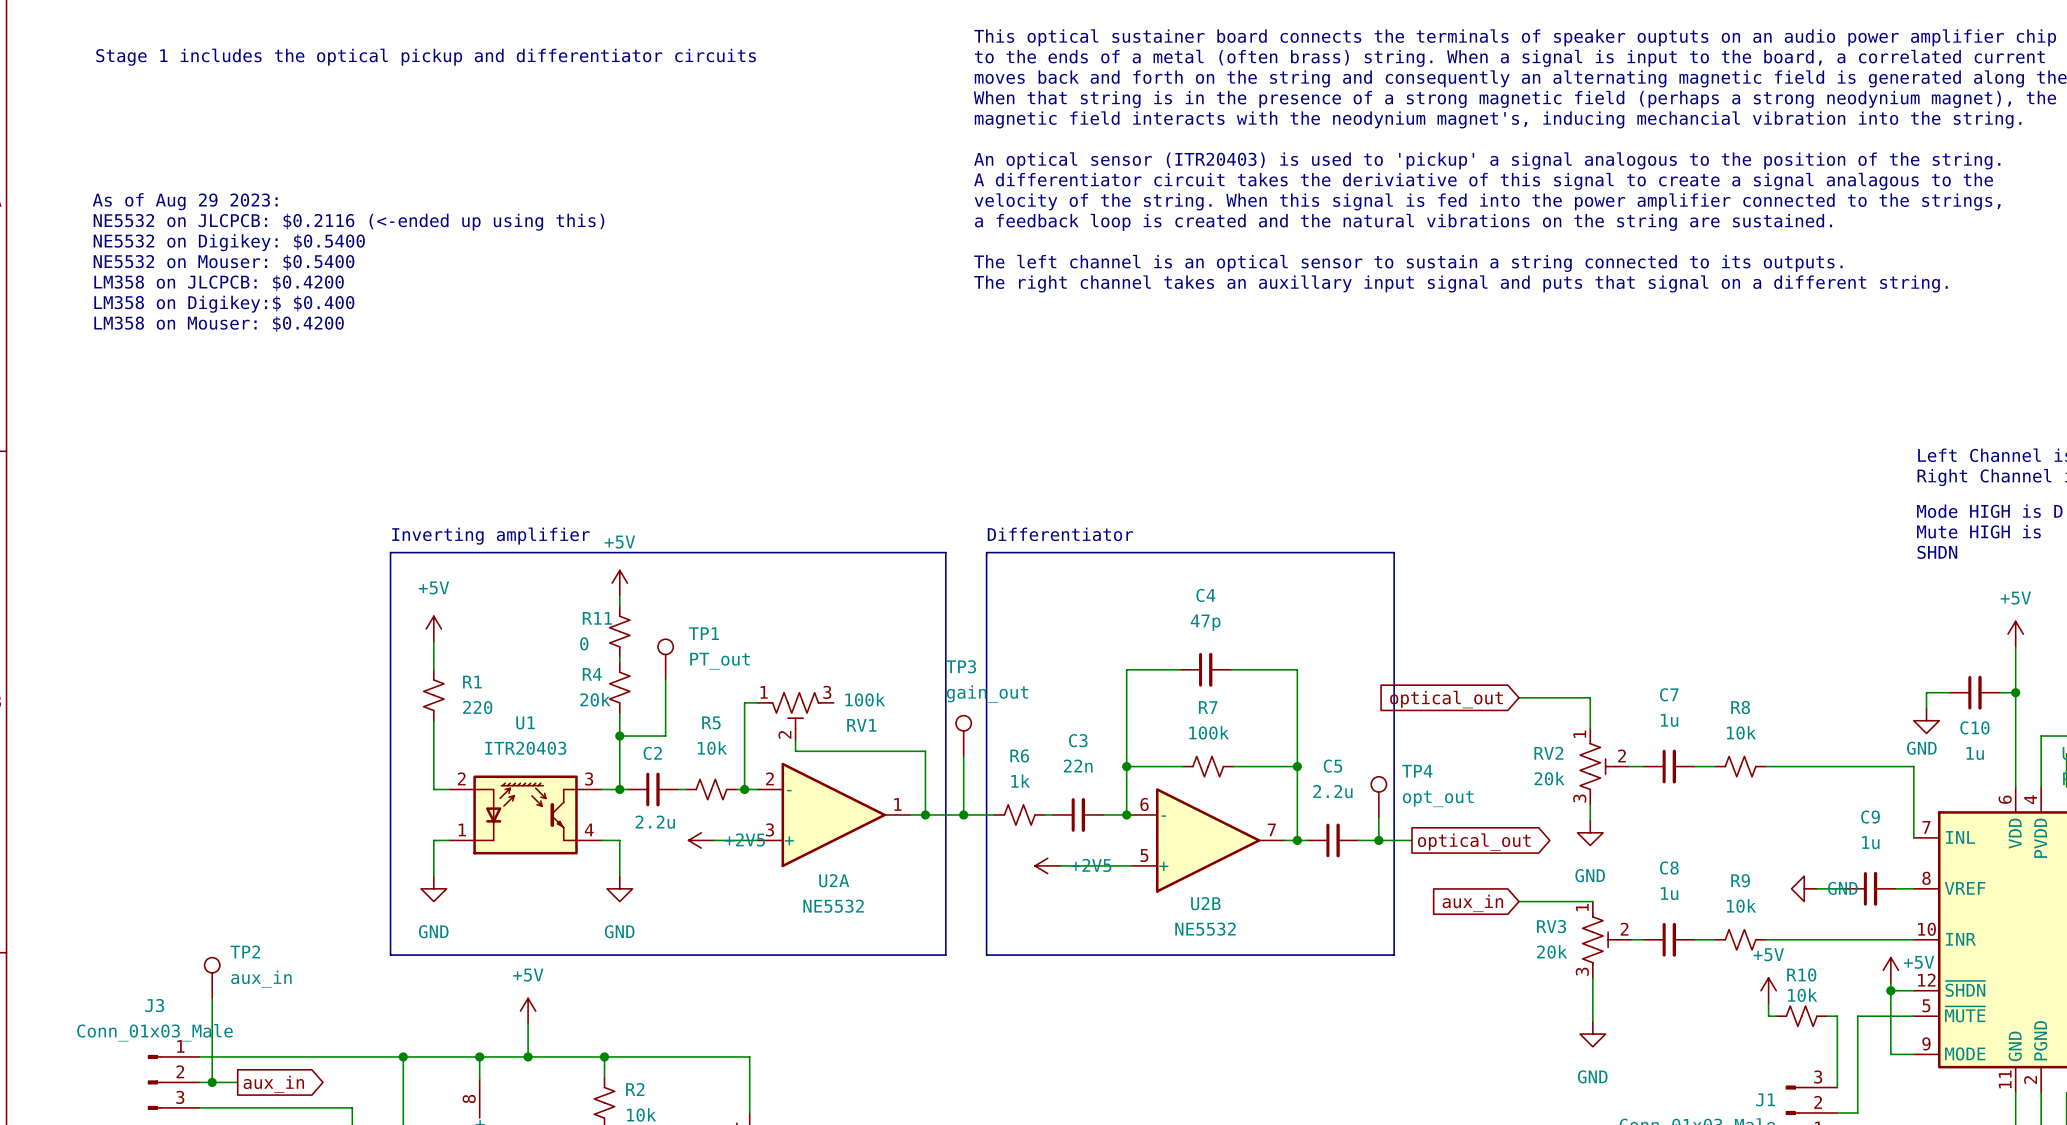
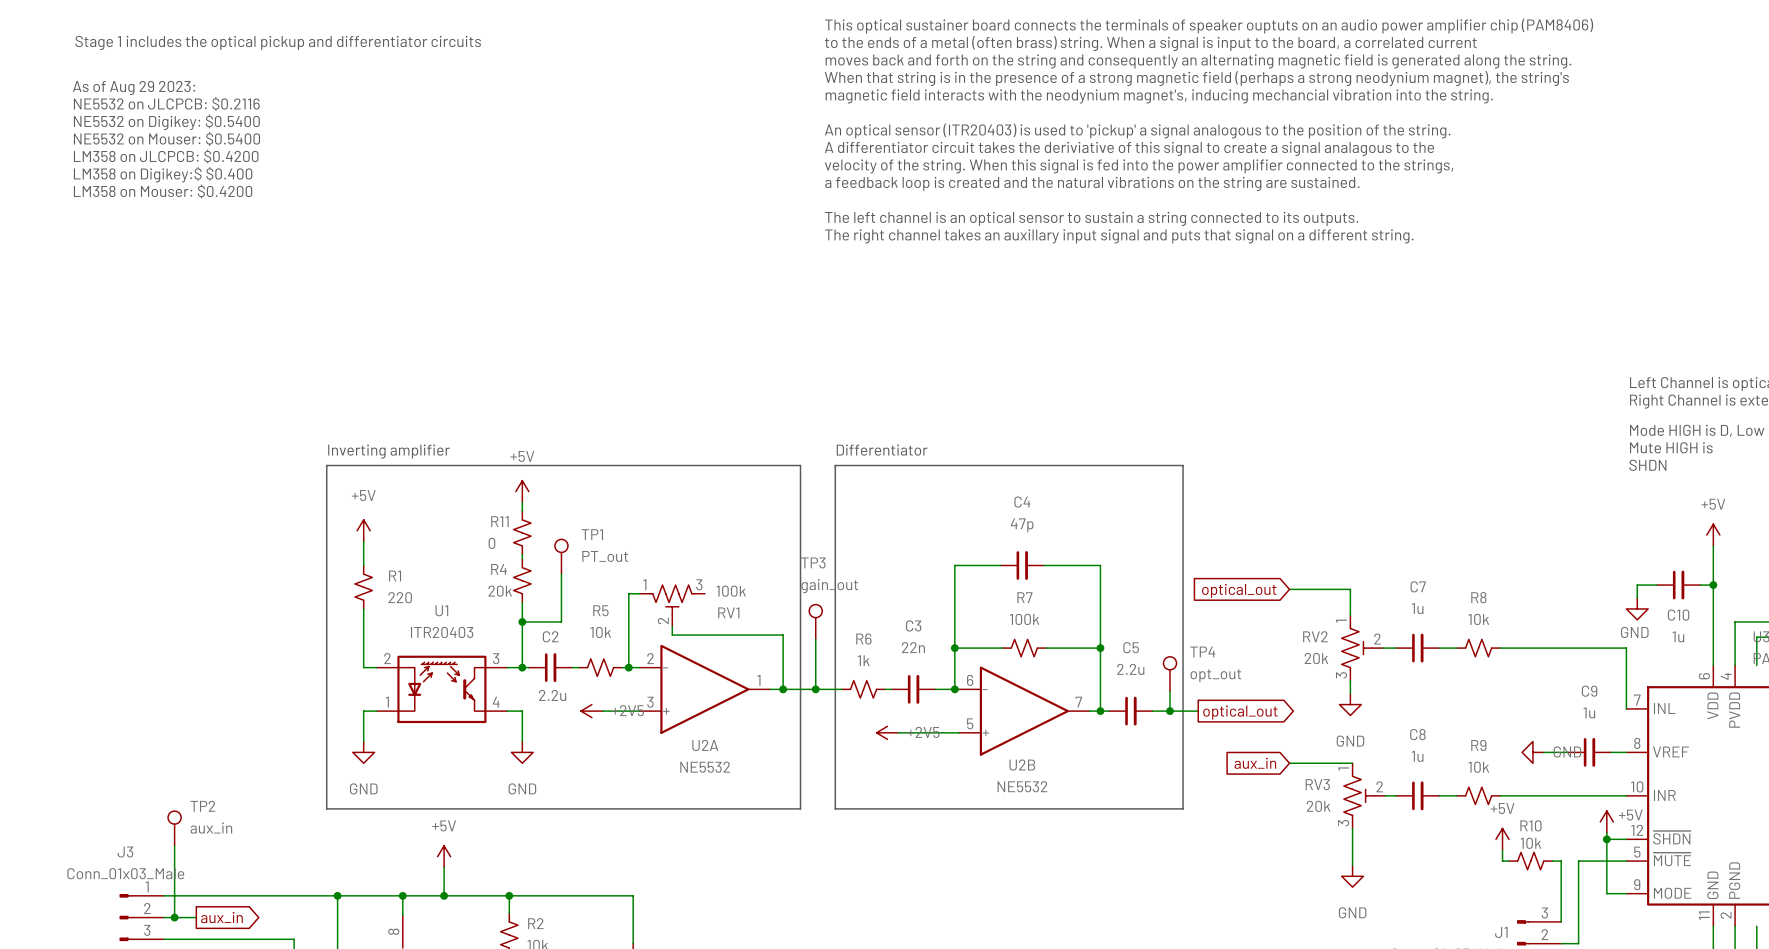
text: none -> NE5532 on JLCPCB: $0.2116 (166, 103)
text position: As of Aug 29 2023: (185, 201) -> As of Aug 29 2023: (134, 87)
text: NE5532 on JLCPCB: $0.2116 (<-ended up using this) (348, 222) -> none
text position: NE5532 on Digikey: $0.5400 (229, 242) -> NE5532 on Digikey: $0.5400 (166, 122)
text position: NE5532 on Mouser: $0.5400 (224, 262) -> NE5532 on Mouser: $0.5400 (166, 138)
text position: LM358 on JLCPCB: $0.4200 (219, 283) -> LM358 on JLCPCB: $0.4200 (166, 156)
text position: LM358 on Digikey:$ $0.400 (224, 304) -> LM358 on Digikey:$ $0.400 (163, 174)
text position: LM358 on Mouser: $0.4200 (219, 324) -> LM358 on Mouser: $0.4200 (163, 191)

